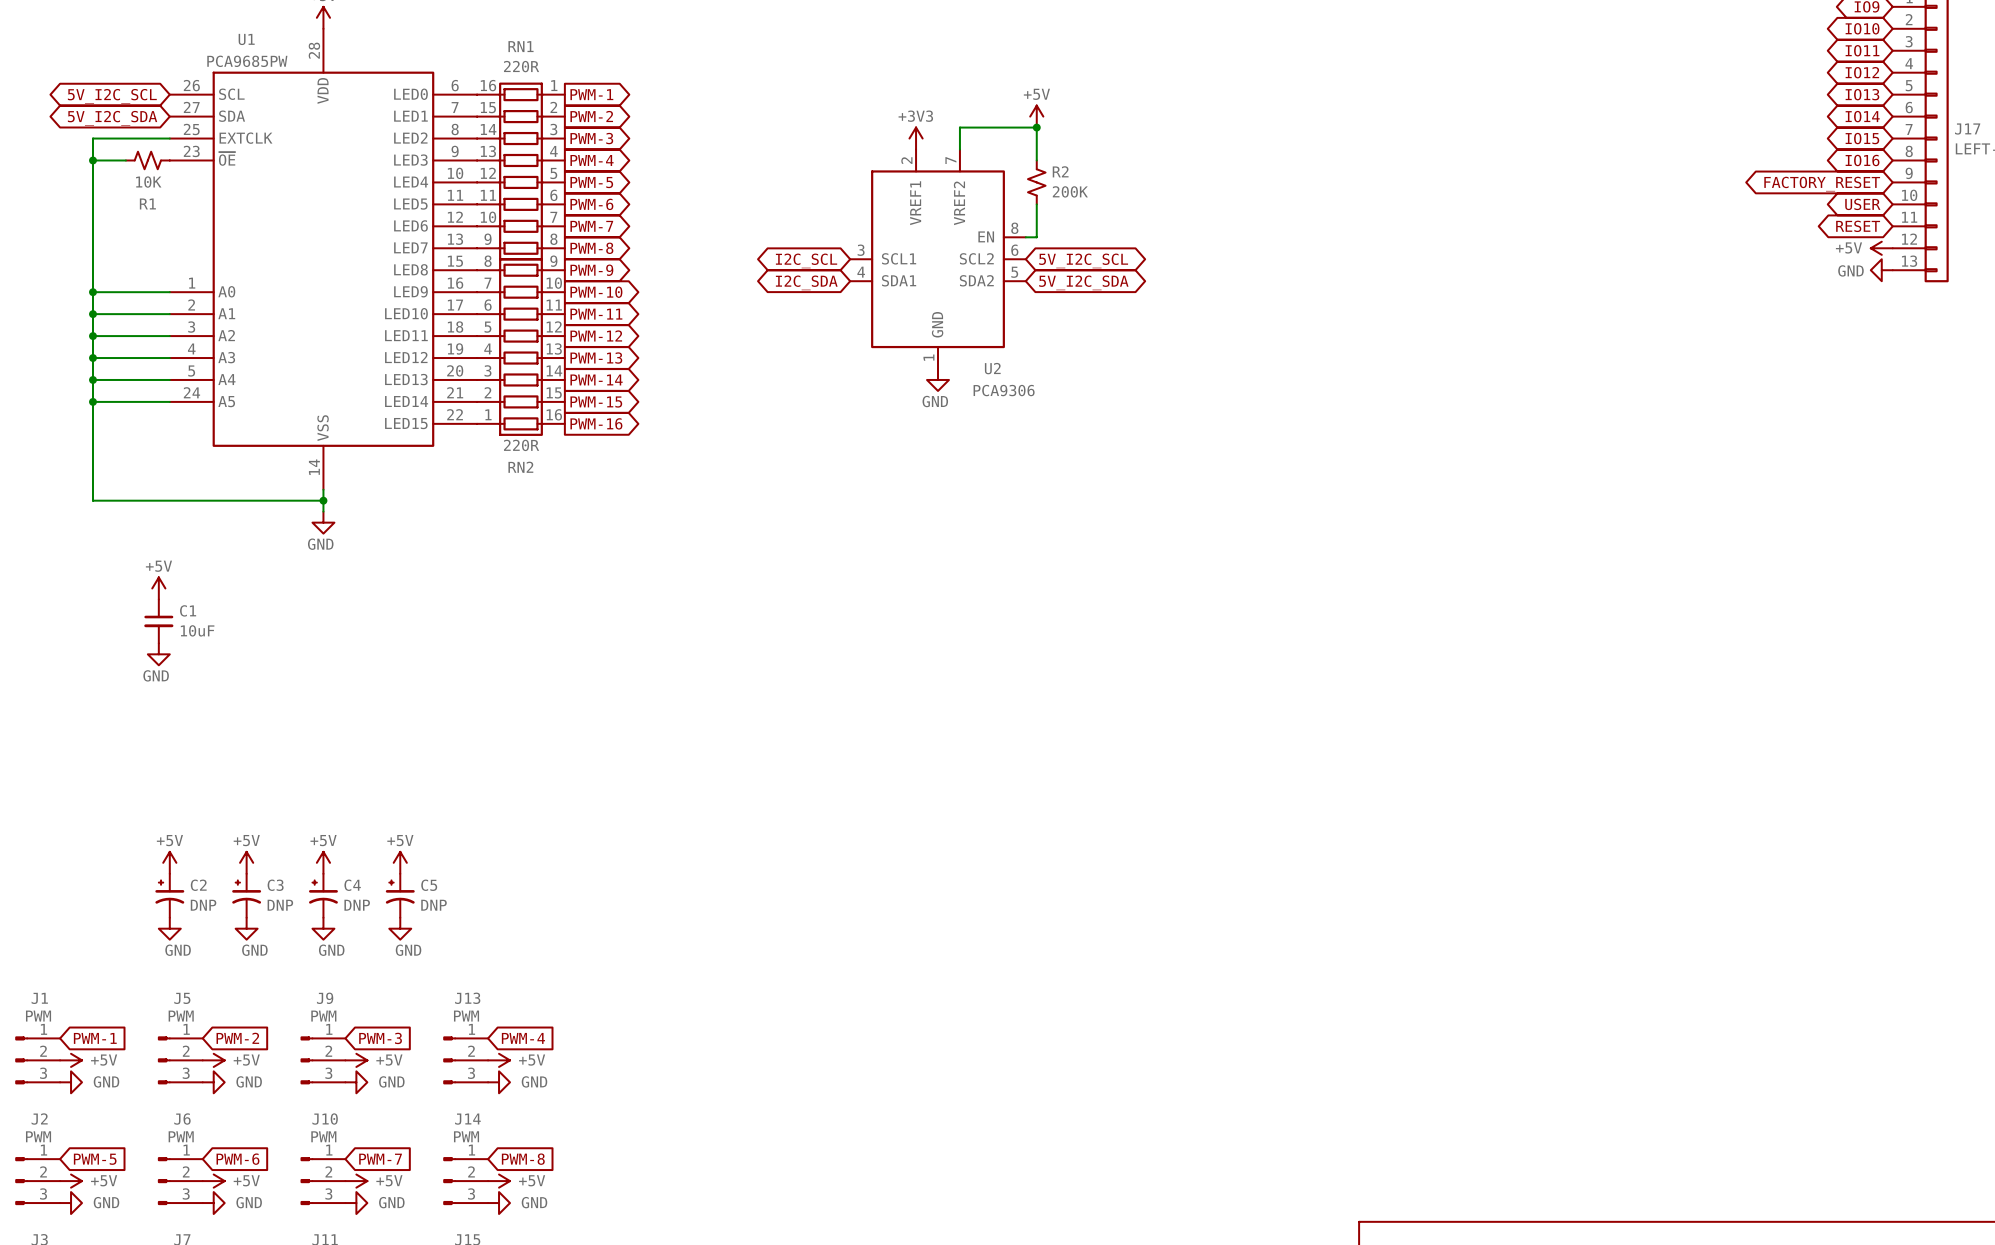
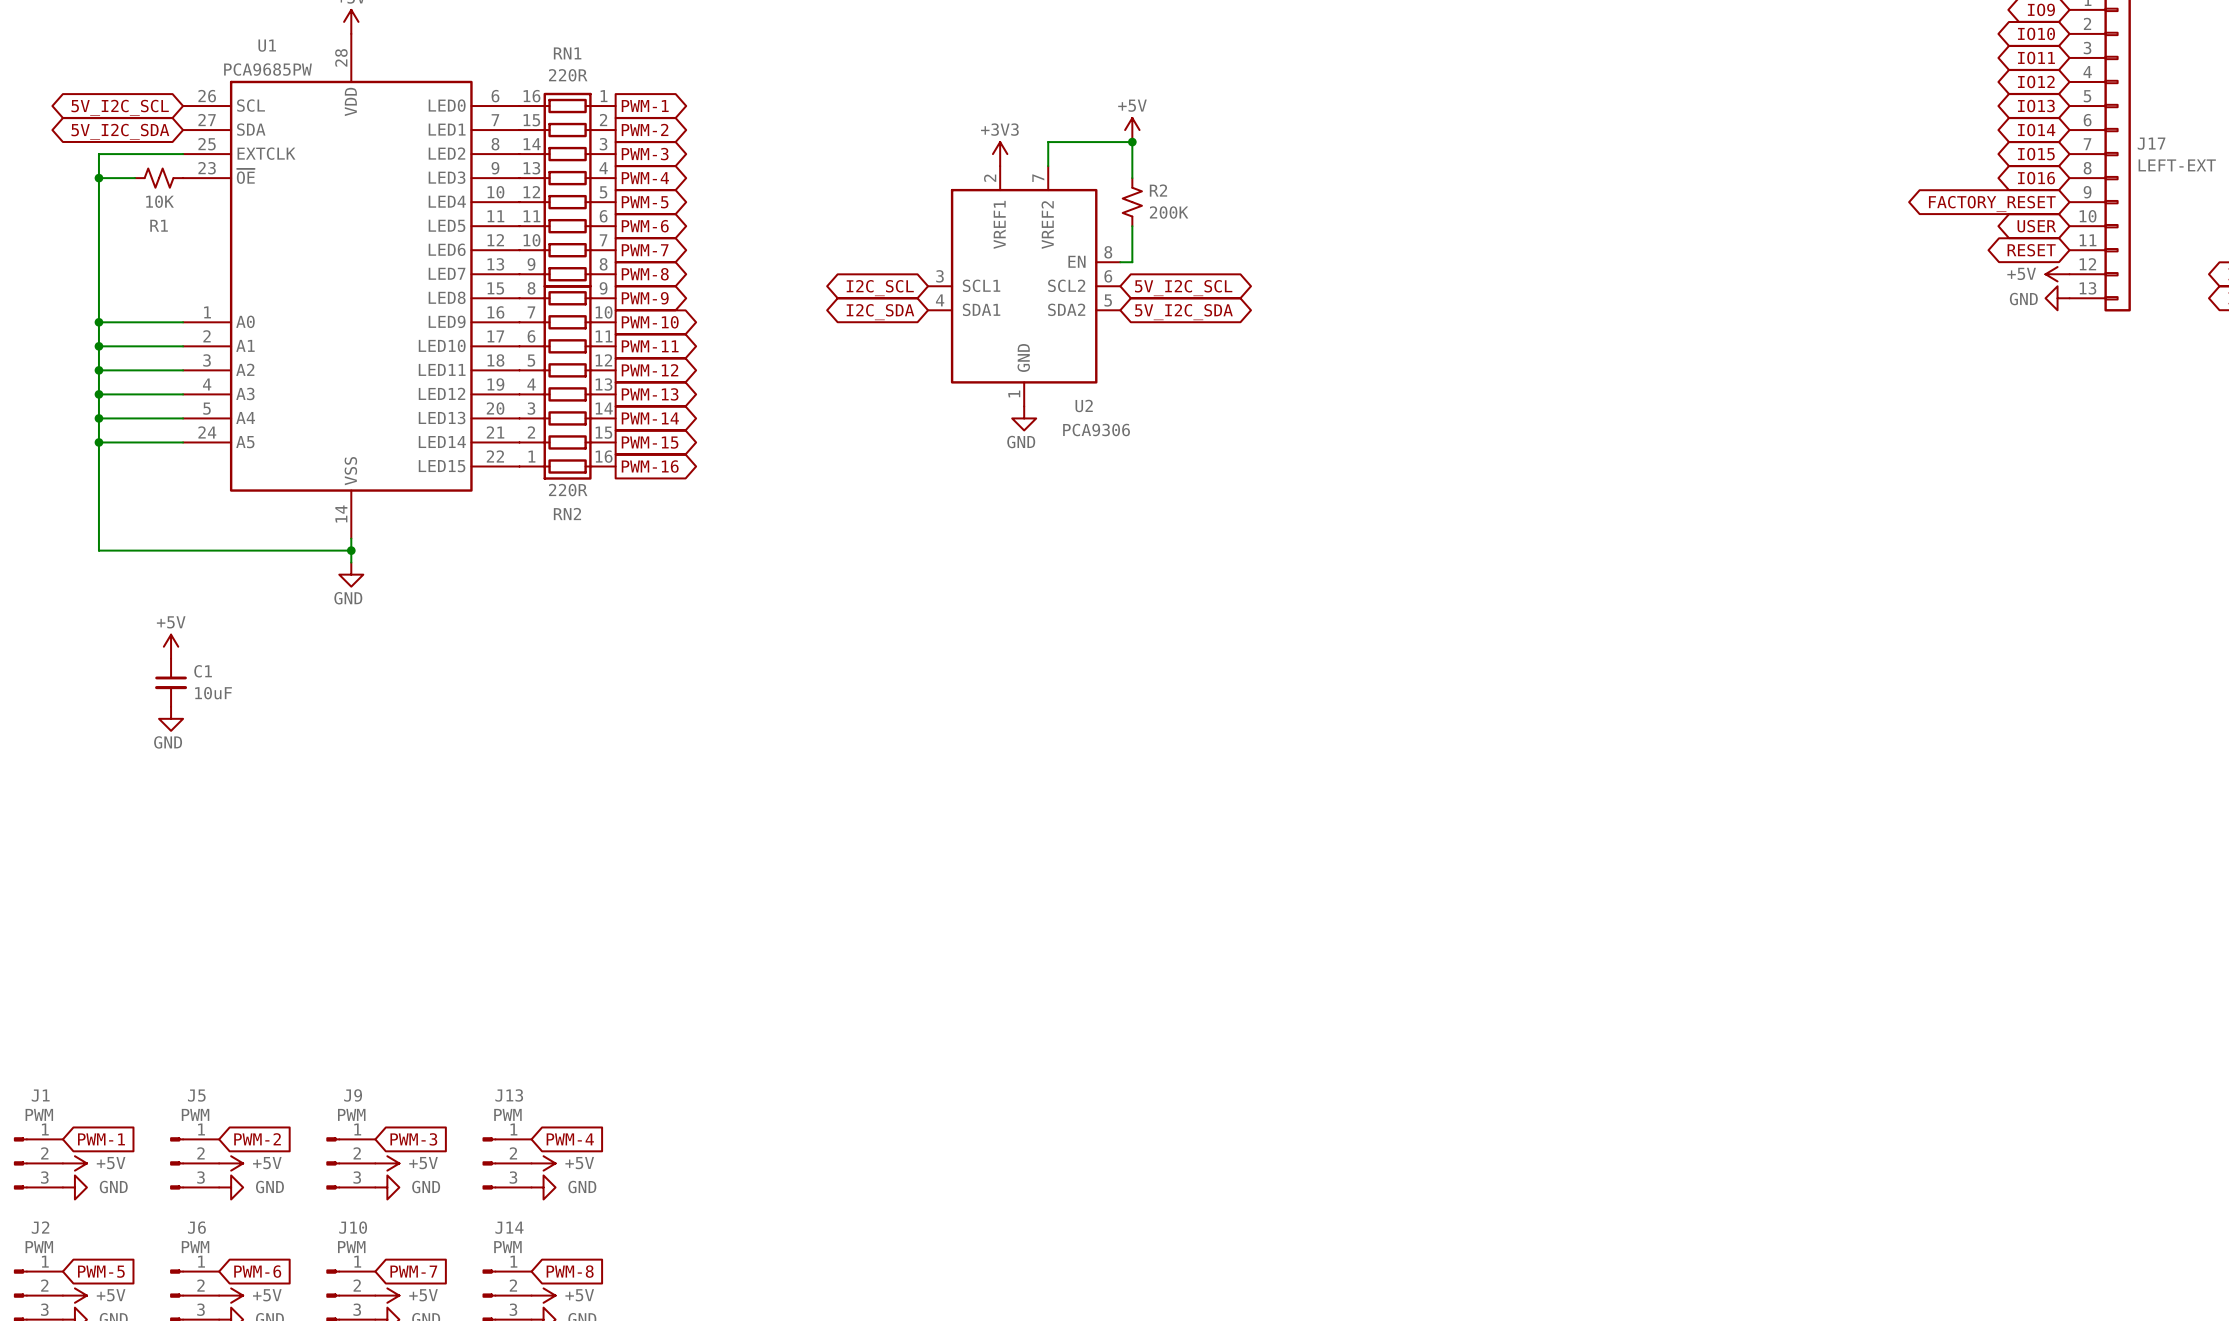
power symbol: +5V (169, 862) -> none
power symbol: +5V (246, 862) -> none
power symbol: +5V (323, 862) -> none
power symbol: +5V (400, 862) -> none
C2: DNP (169, 895) -> none
C3: DNP (246, 895) -> none
C4: DNP (323, 895) -> none
C5: DNP (400, 895) -> none
power symbol: GND (169, 928) -> none
power symbol: GND (246, 928) -> none
power symbol: GND (323, 928) -> none
power symbol: GND (400, 928) -> none

